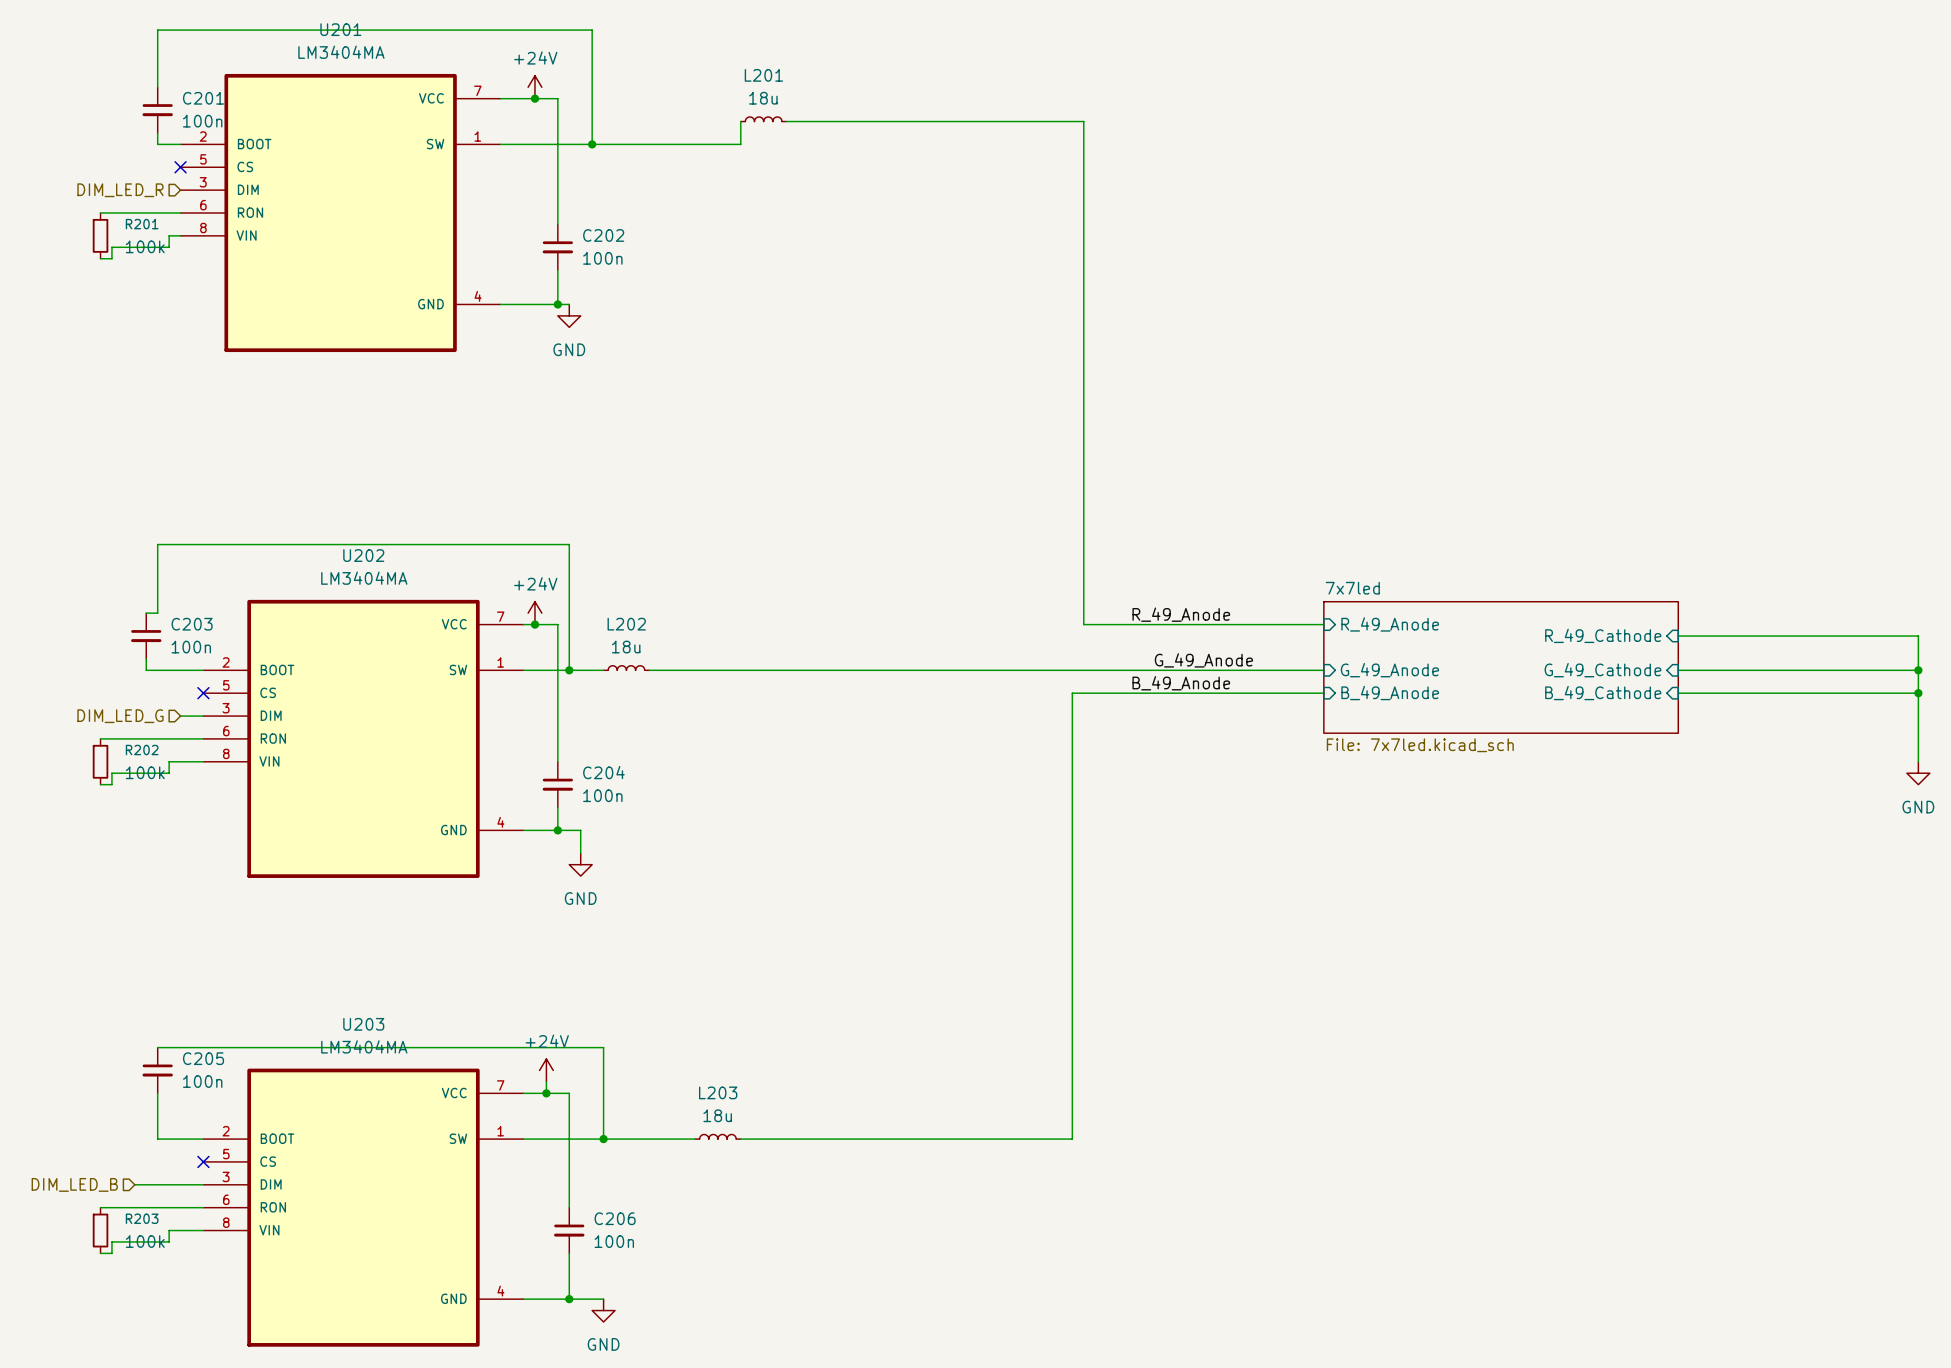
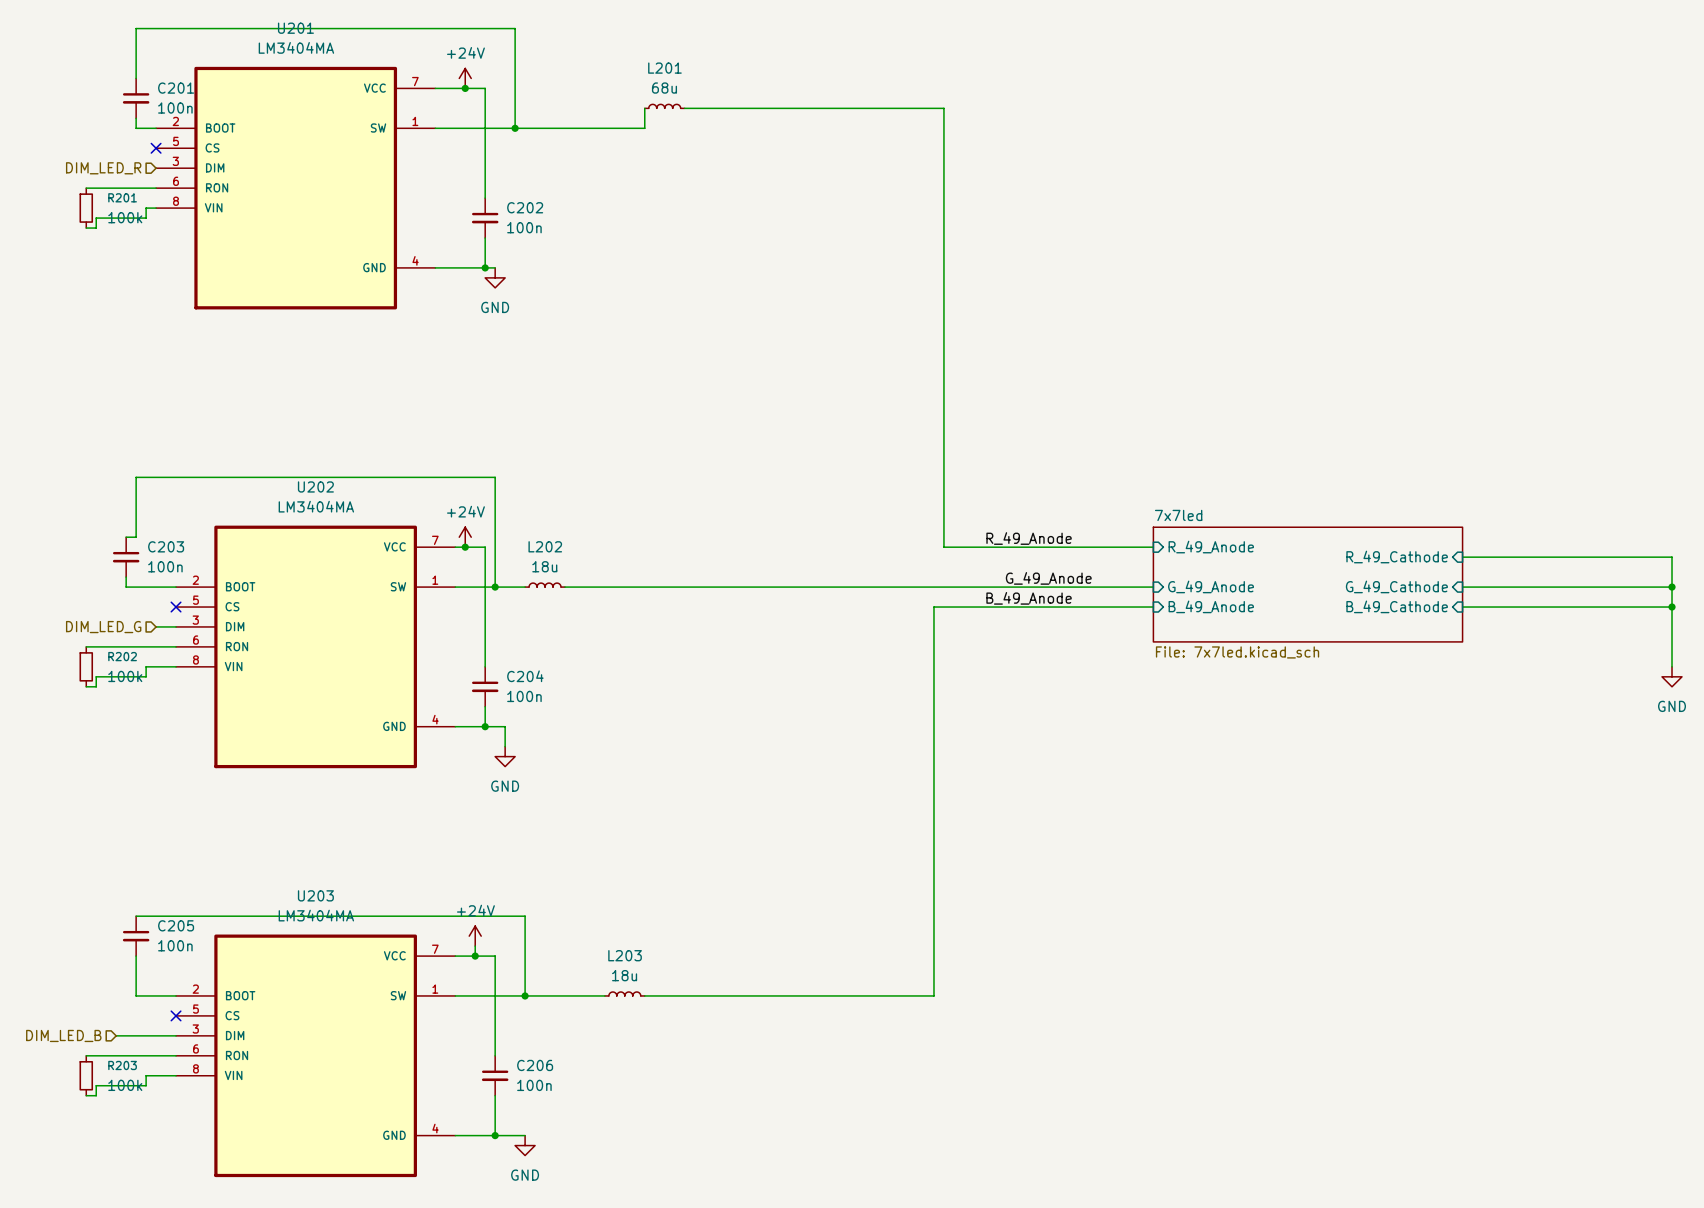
L201 value: 18u (763, 98) -> 68u (664, 88)

